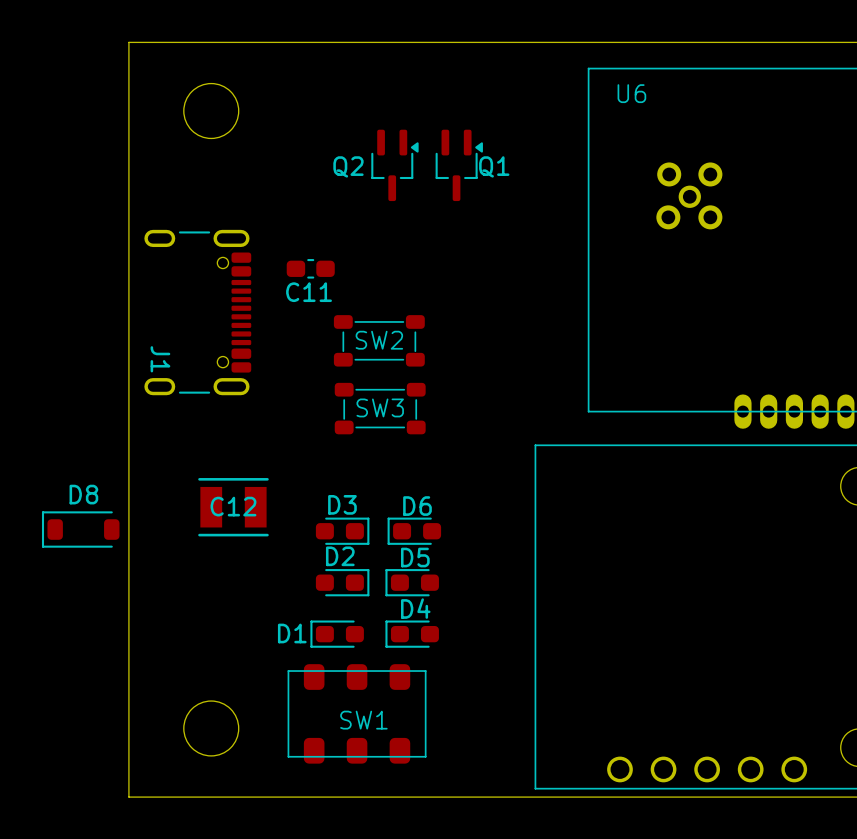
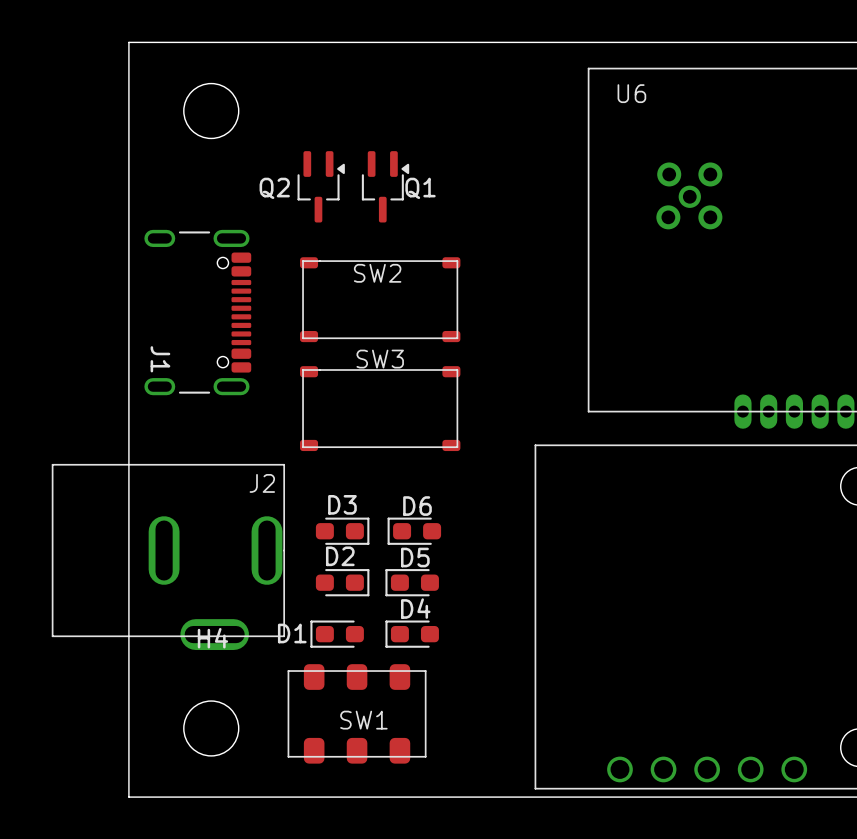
Q2 position: (394, 165) -> (321, 186)
Q1 position: (459, 165) -> (385, 186)
C11: (310, 268) -> none
SW2 footprint: [333, 315, 425, 367] -> [300, 257, 461, 343]
SW3 footprint: [334, 382, 426, 435] -> [300, 366, 461, 452]
SW3 name position: SW3 (380, 407) -> SW3 (380, 359)
C12: (233, 507) -> none
D8: (80, 529) -> none
J2: none -> (168, 556)
H4 name: none -> H4 (212, 638)

